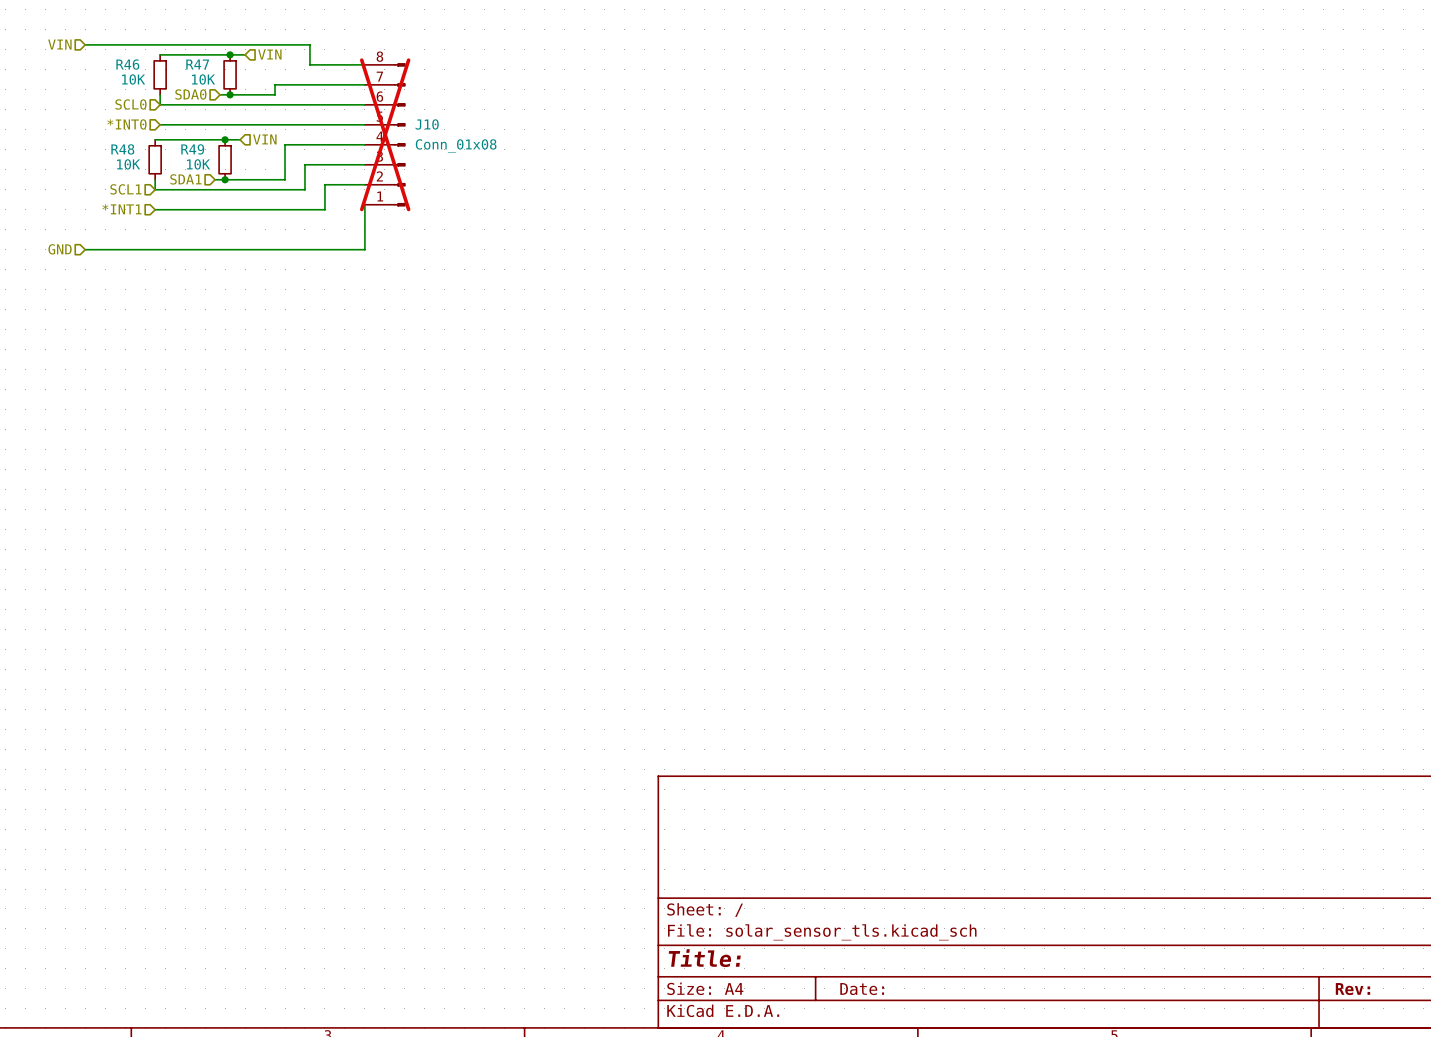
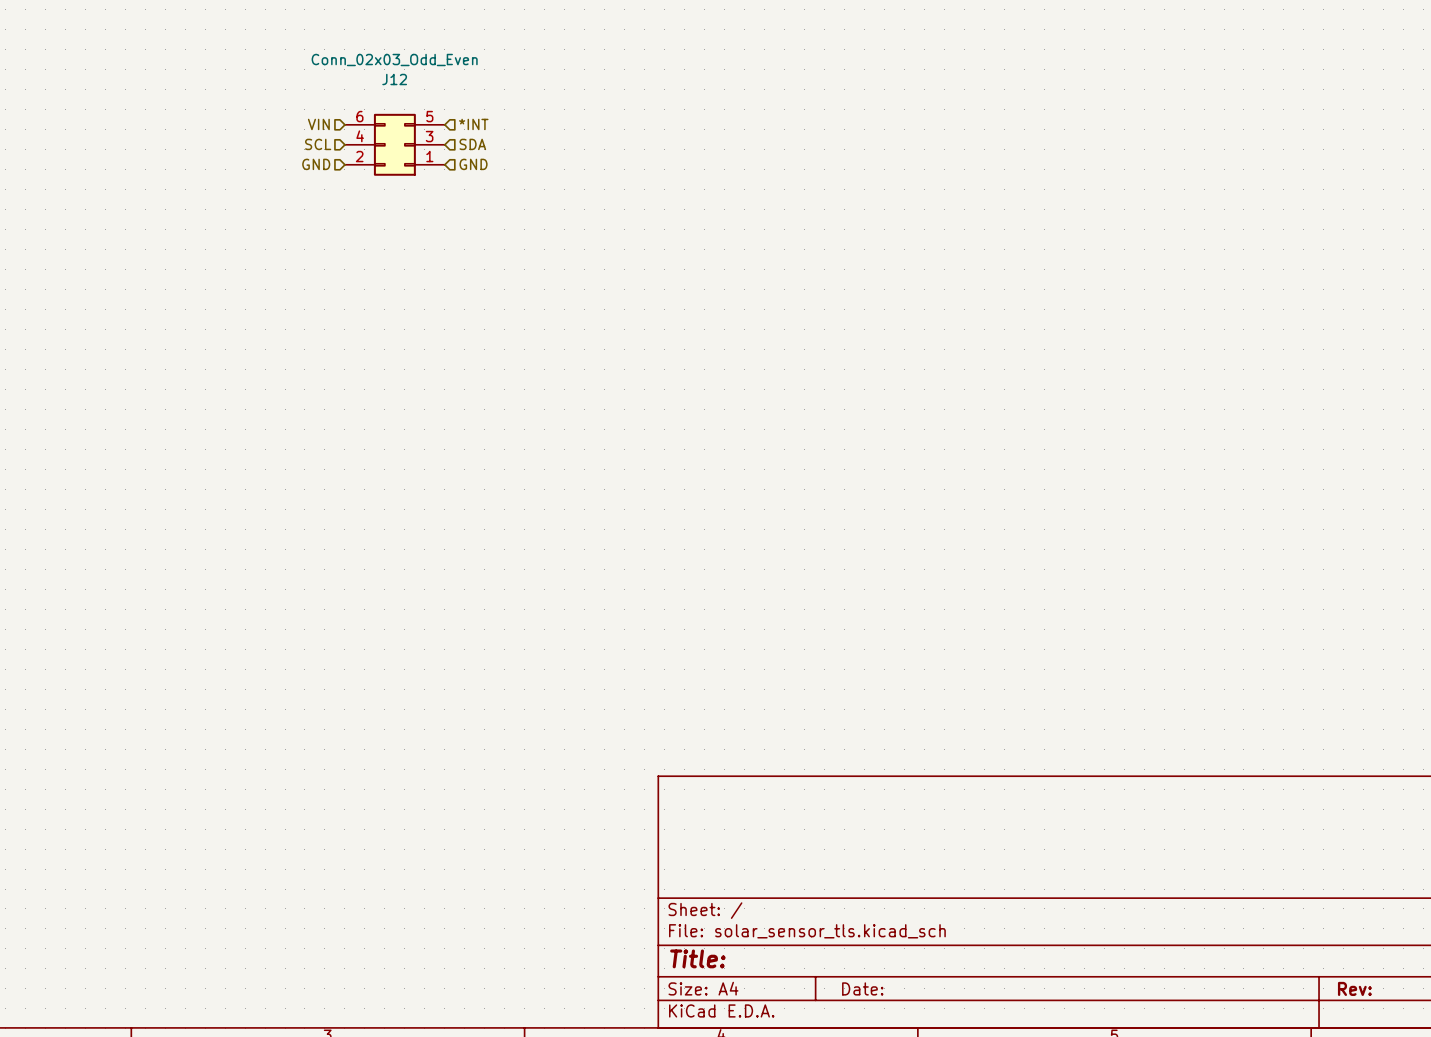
hierarchical label: VIN (59, 44) -> none
wire: (85, 44) (309, 44) (309, 64) (364, 64) -> none
wire: (160, 54) (245, 54) -> none
junction: (230, 54) -> none
hierarchical label: VIN (269, 54) -> none
R46: 10K (160, 74) -> none
R47: 10K (230, 74) -> none
wire: (364, 84) (275, 84) (275, 94) (220, 94) -> none
wire: (160, 94) (160, 104) (364, 104) -> none
hierarchical label: SDA0 (190, 94) -> none
junction: (230, 94) -> none
hierarchical label: SCL0 (130, 104) -> none
hierarchical label: *INT0 (126, 124) -> none
wire: (160, 124) (364, 124) -> none
hierarchical label: none -> VIN (318, 124)
hierarchical label: none -> *INT (473, 124)
J10: Conn_01x08 (385, 134) -> none
wire: (155, 139) (240, 139) -> none
junction: (225, 139) -> none
hierarchical label: VIN (264, 139) -> none
hierarchical label: none -> SCL (318, 144)
wire: (364, 144) (285, 144) (285, 179) (215, 179) -> none
J12: none -> Conn_02x03_Odd_Even (394, 144)
hierarchical label: none -> SDA (472, 144)
R48: 10K (155, 159) -> none
R49: 10K (225, 159) -> none
hierarchical label: none -> GND (316, 164)
wire: (364, 164) (304, 164) (304, 189) (155, 189) (155, 179) -> none
hierarchical label: none -> GND (473, 164)
hierarchical label: SDA1 (185, 179) -> none
junction: (225, 179) -> none
wire: (364, 184) (324, 184) (324, 209) (155, 209) -> none
hierarchical label: SCL1 (125, 189) -> none
wire: (364, 204) (364, 249) (85, 249) -> none
hierarchical label: *INT1 (121, 209) -> none
hierarchical label: GND (60, 249) -> none

